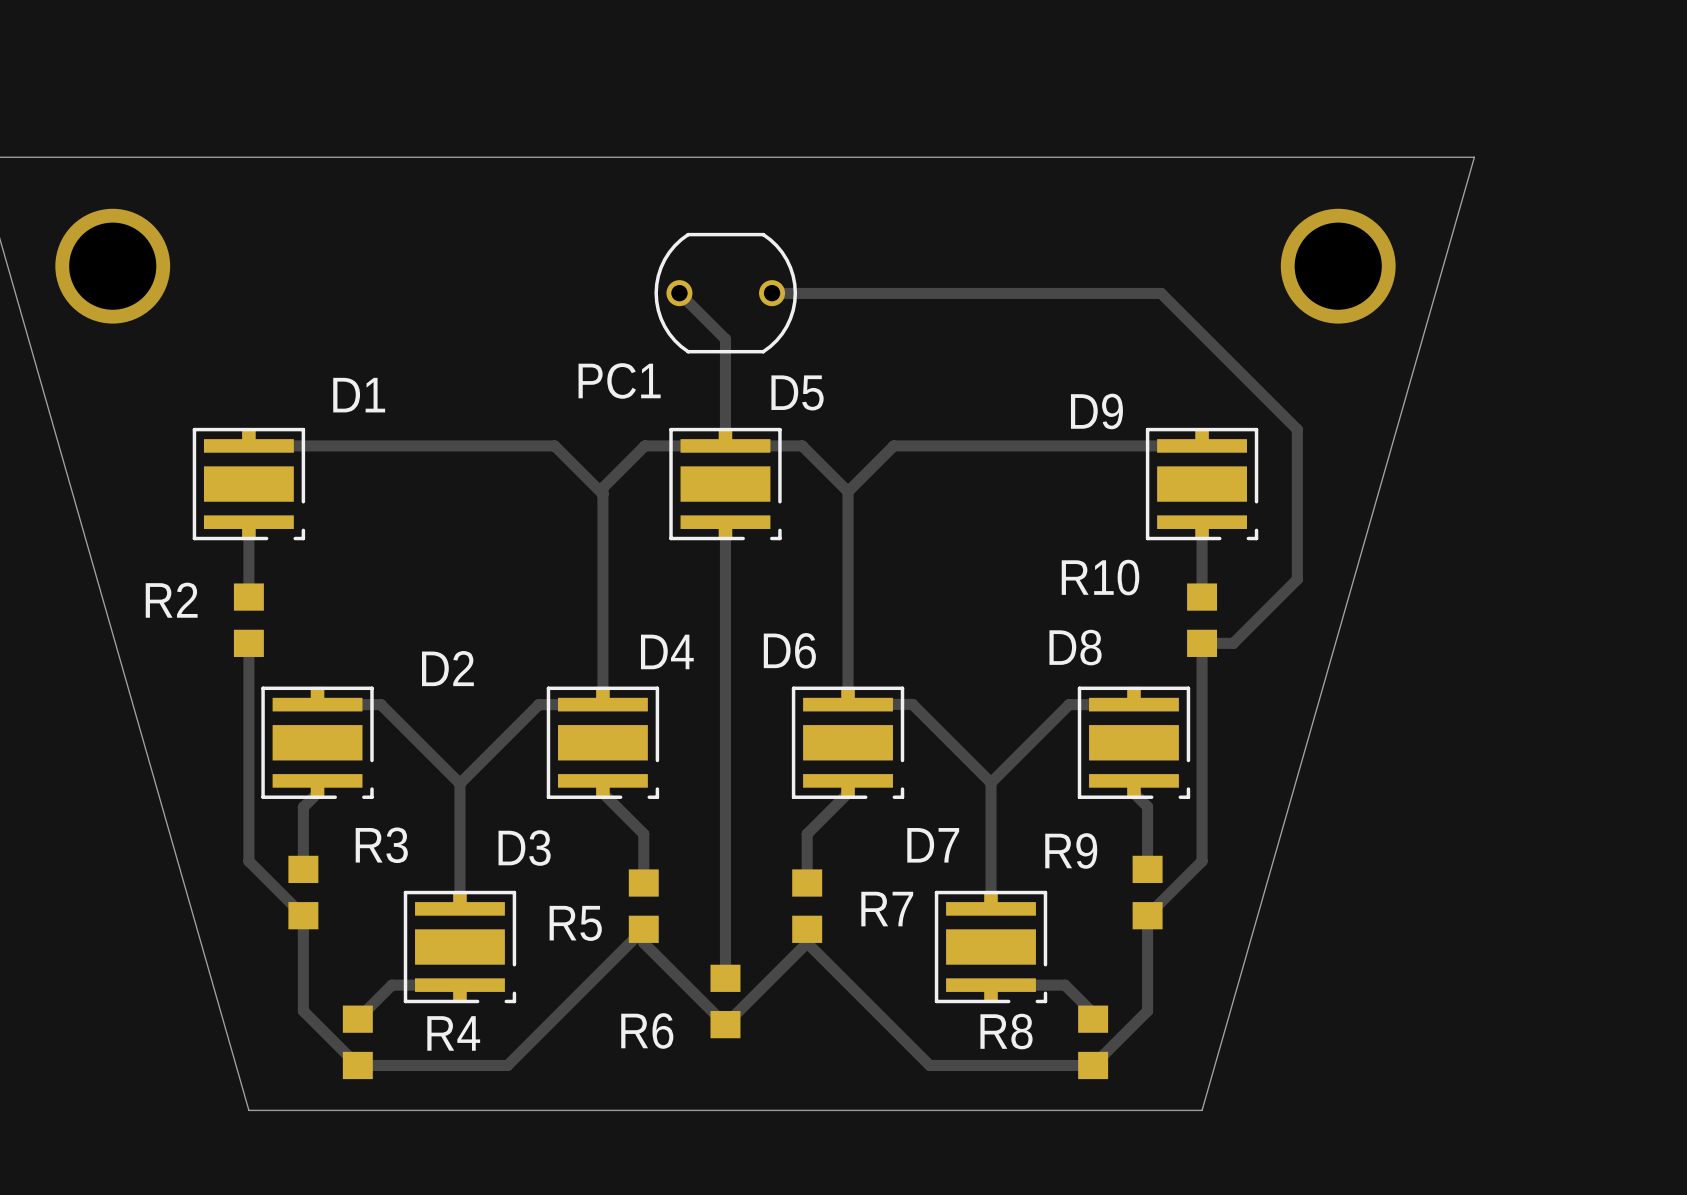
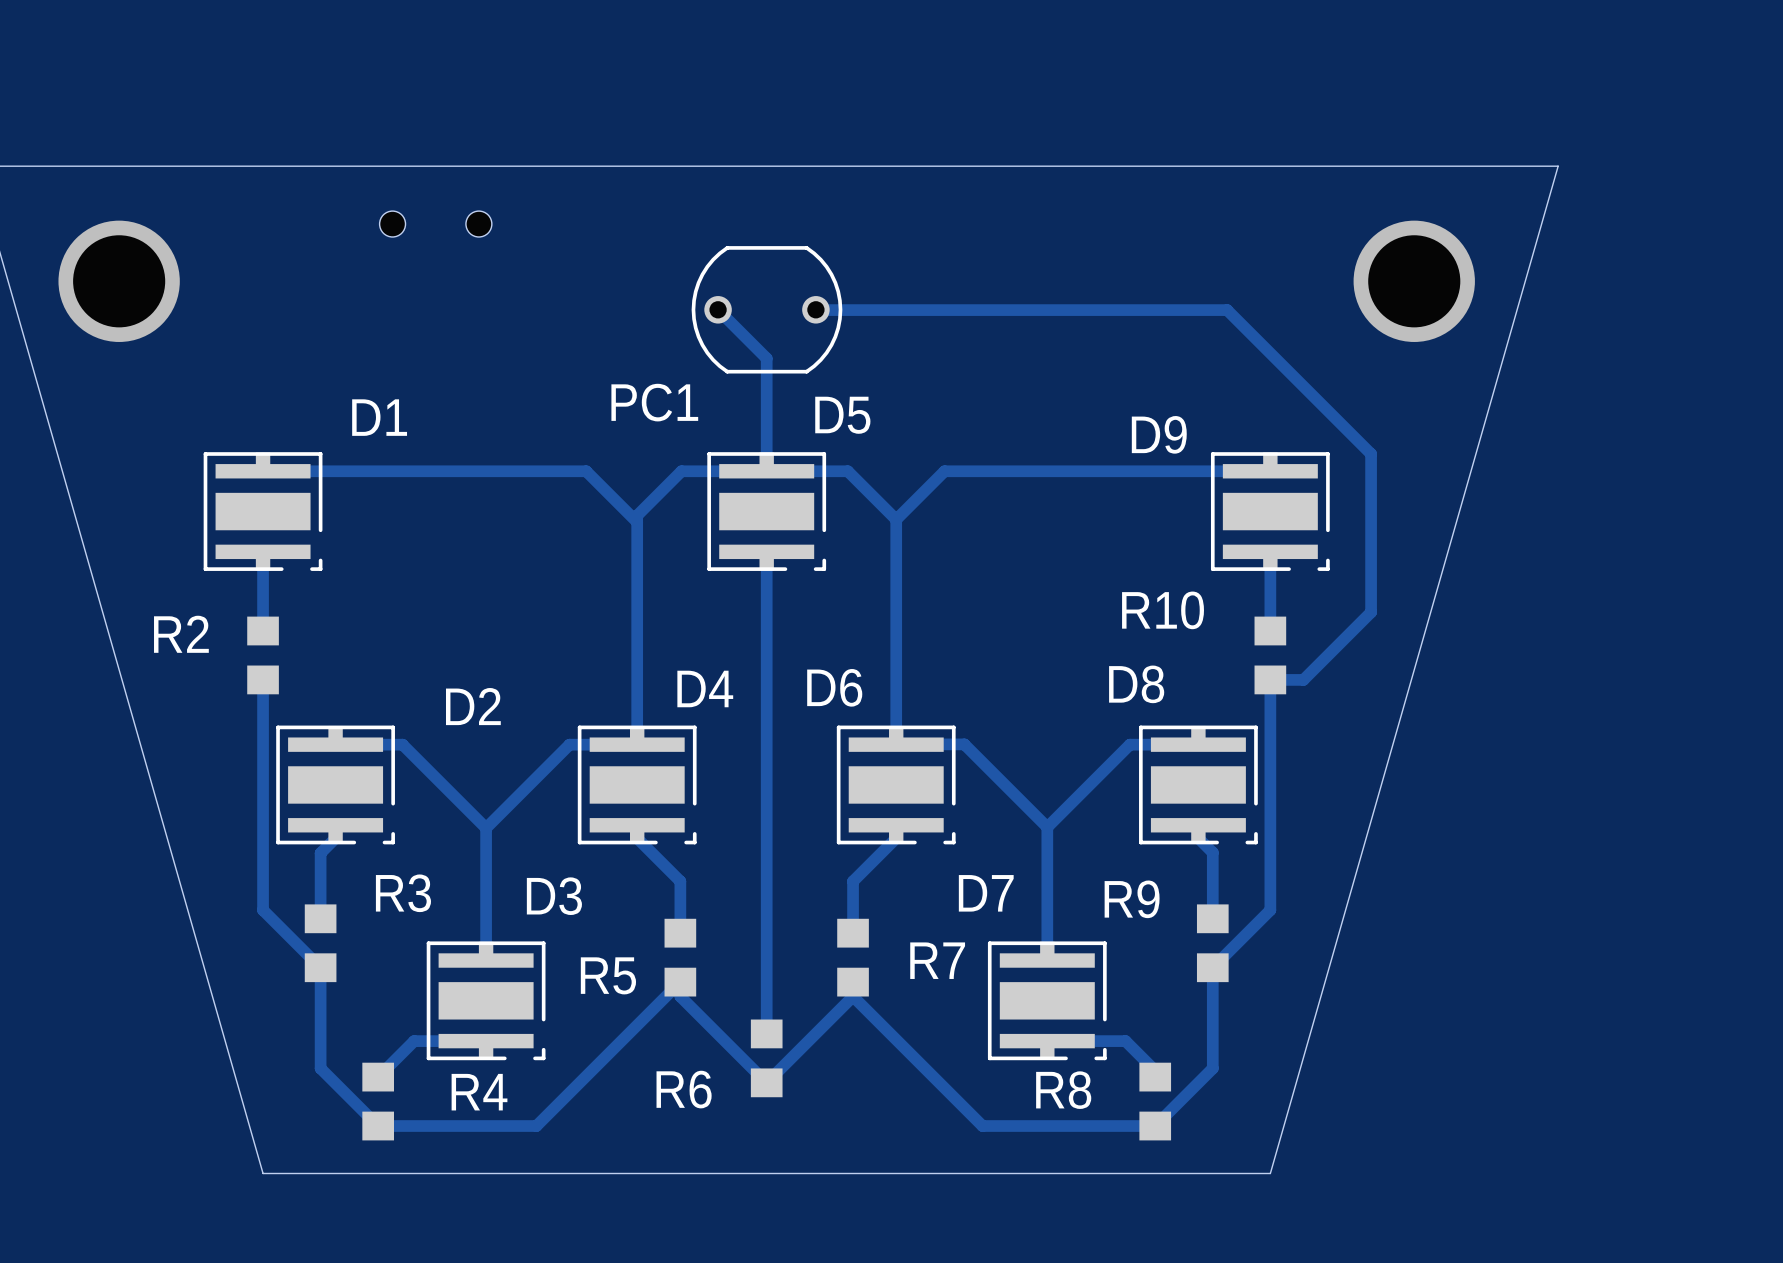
part: none -> (435, 224)

